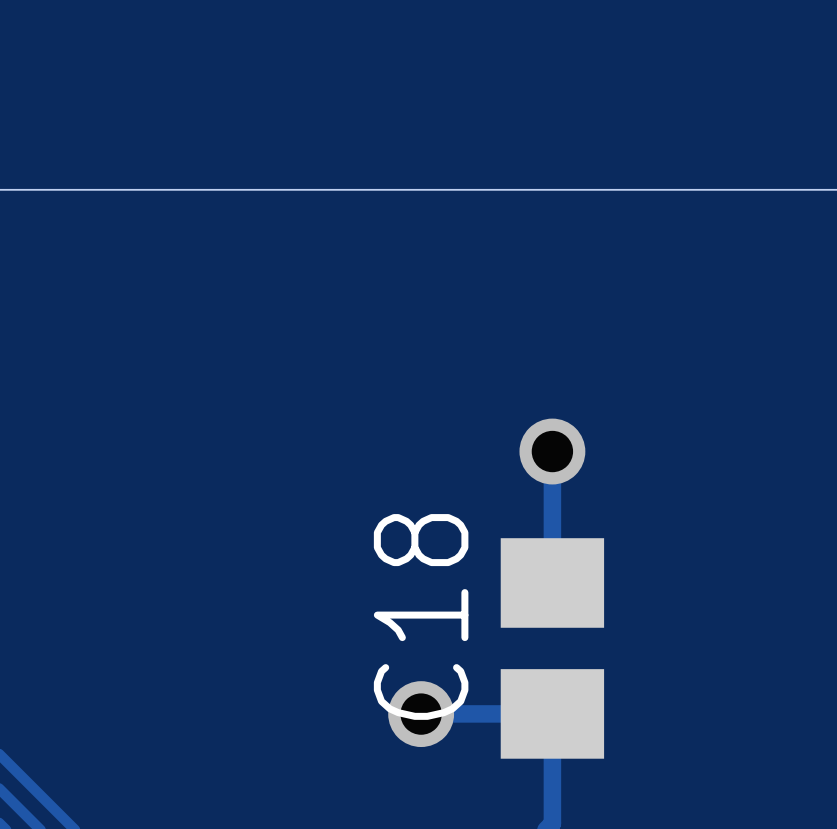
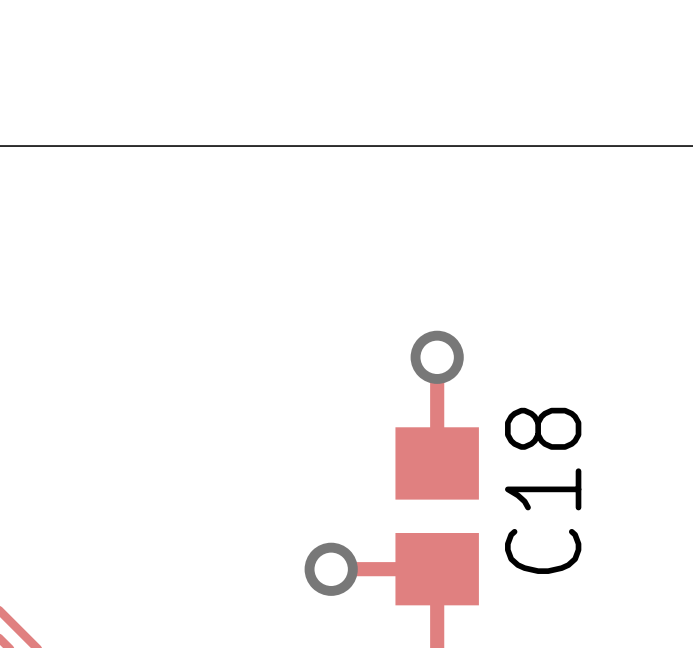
C18 name position: C18 (421, 616) -> C18 (543, 490)

